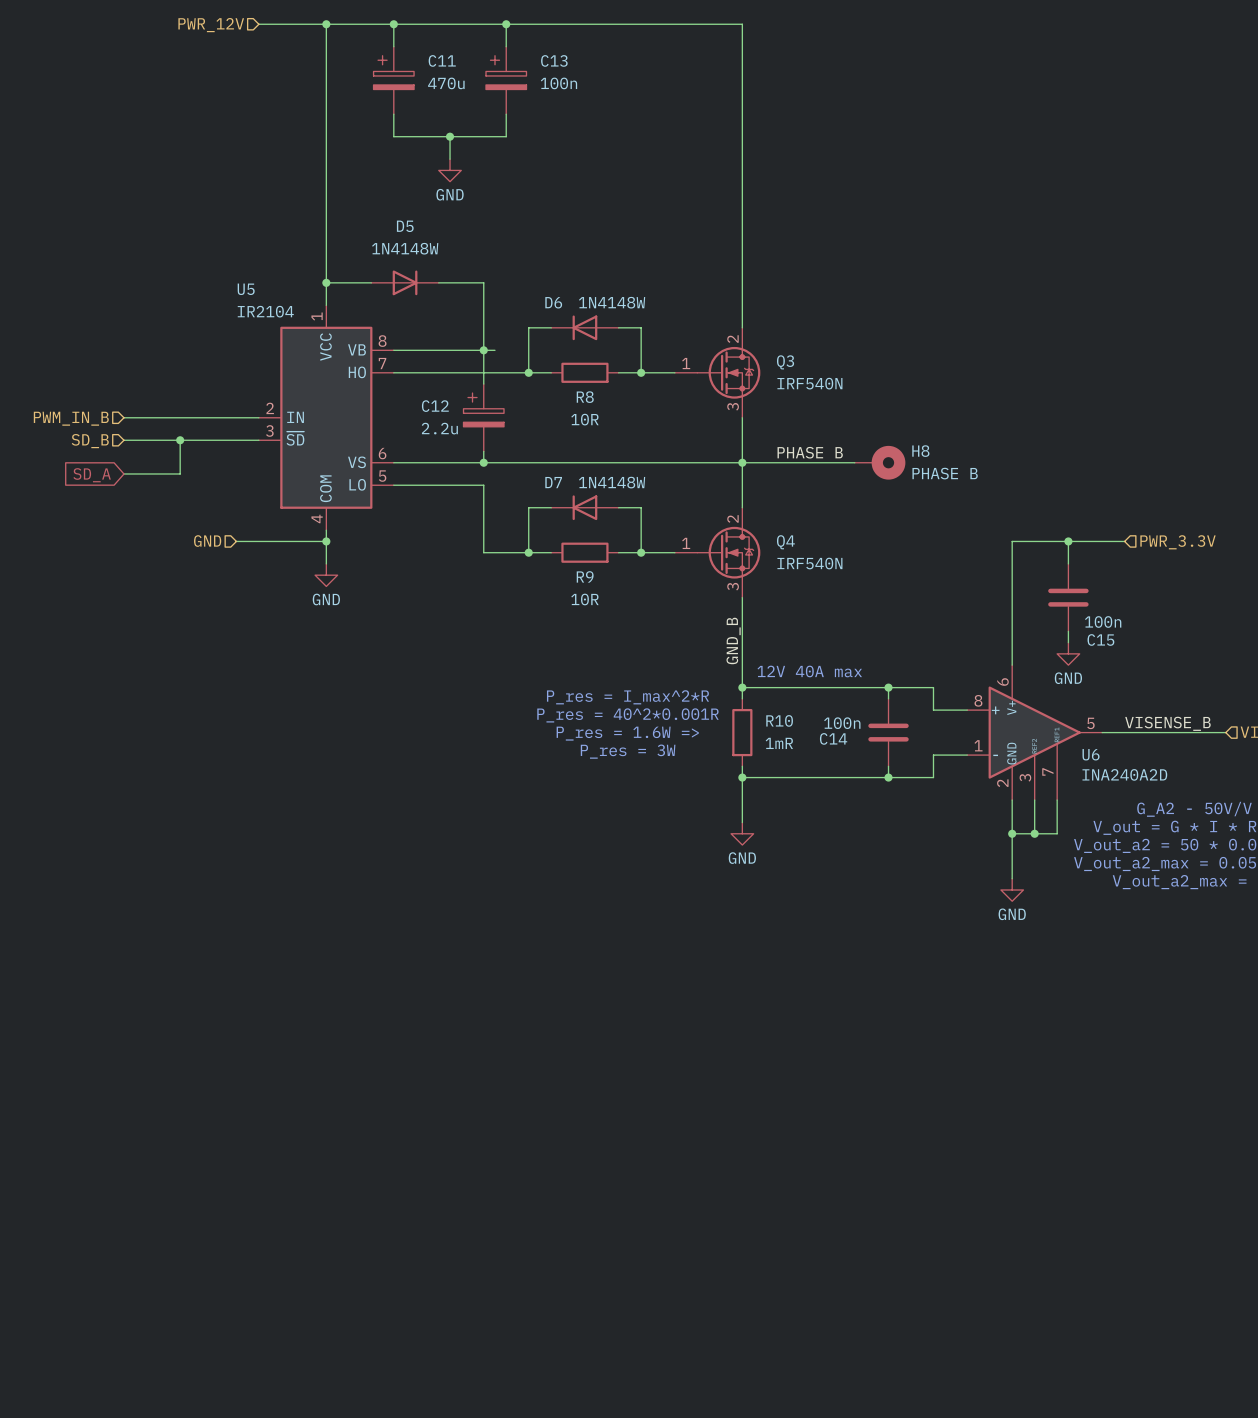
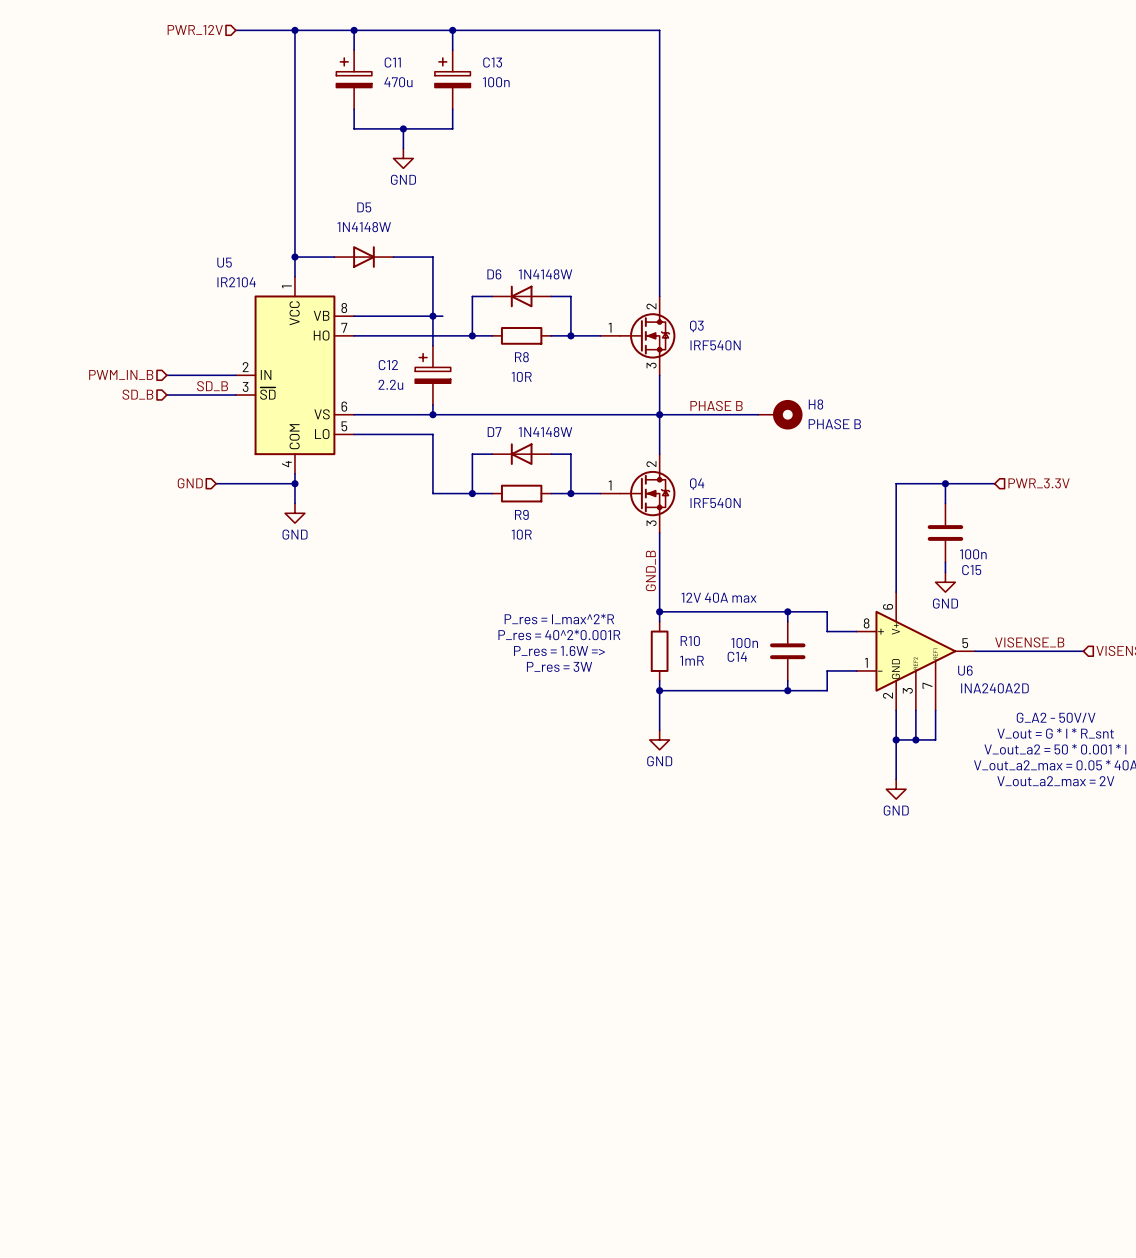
wire: (123, 417) (180, 417) -> none
hierarchical label position: PWM_IN_B (71, 418) -> PWM_IN_B (121, 374)
label: none -> SD_B (212, 386)
wire: (123, 440) (180, 440) (180, 473) (123, 473) -> none
junction: (180, 440) -> none
hierarchical label position: SD_B (90, 441) -> SD_B (137, 394)
global label: SD_A (92, 475) -> none

